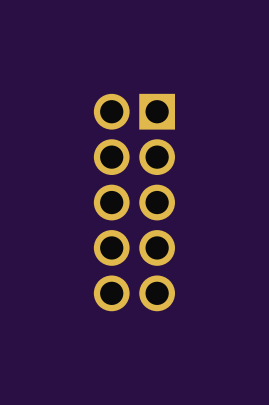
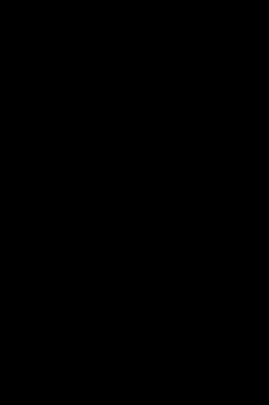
part: (134, 202) -> none

